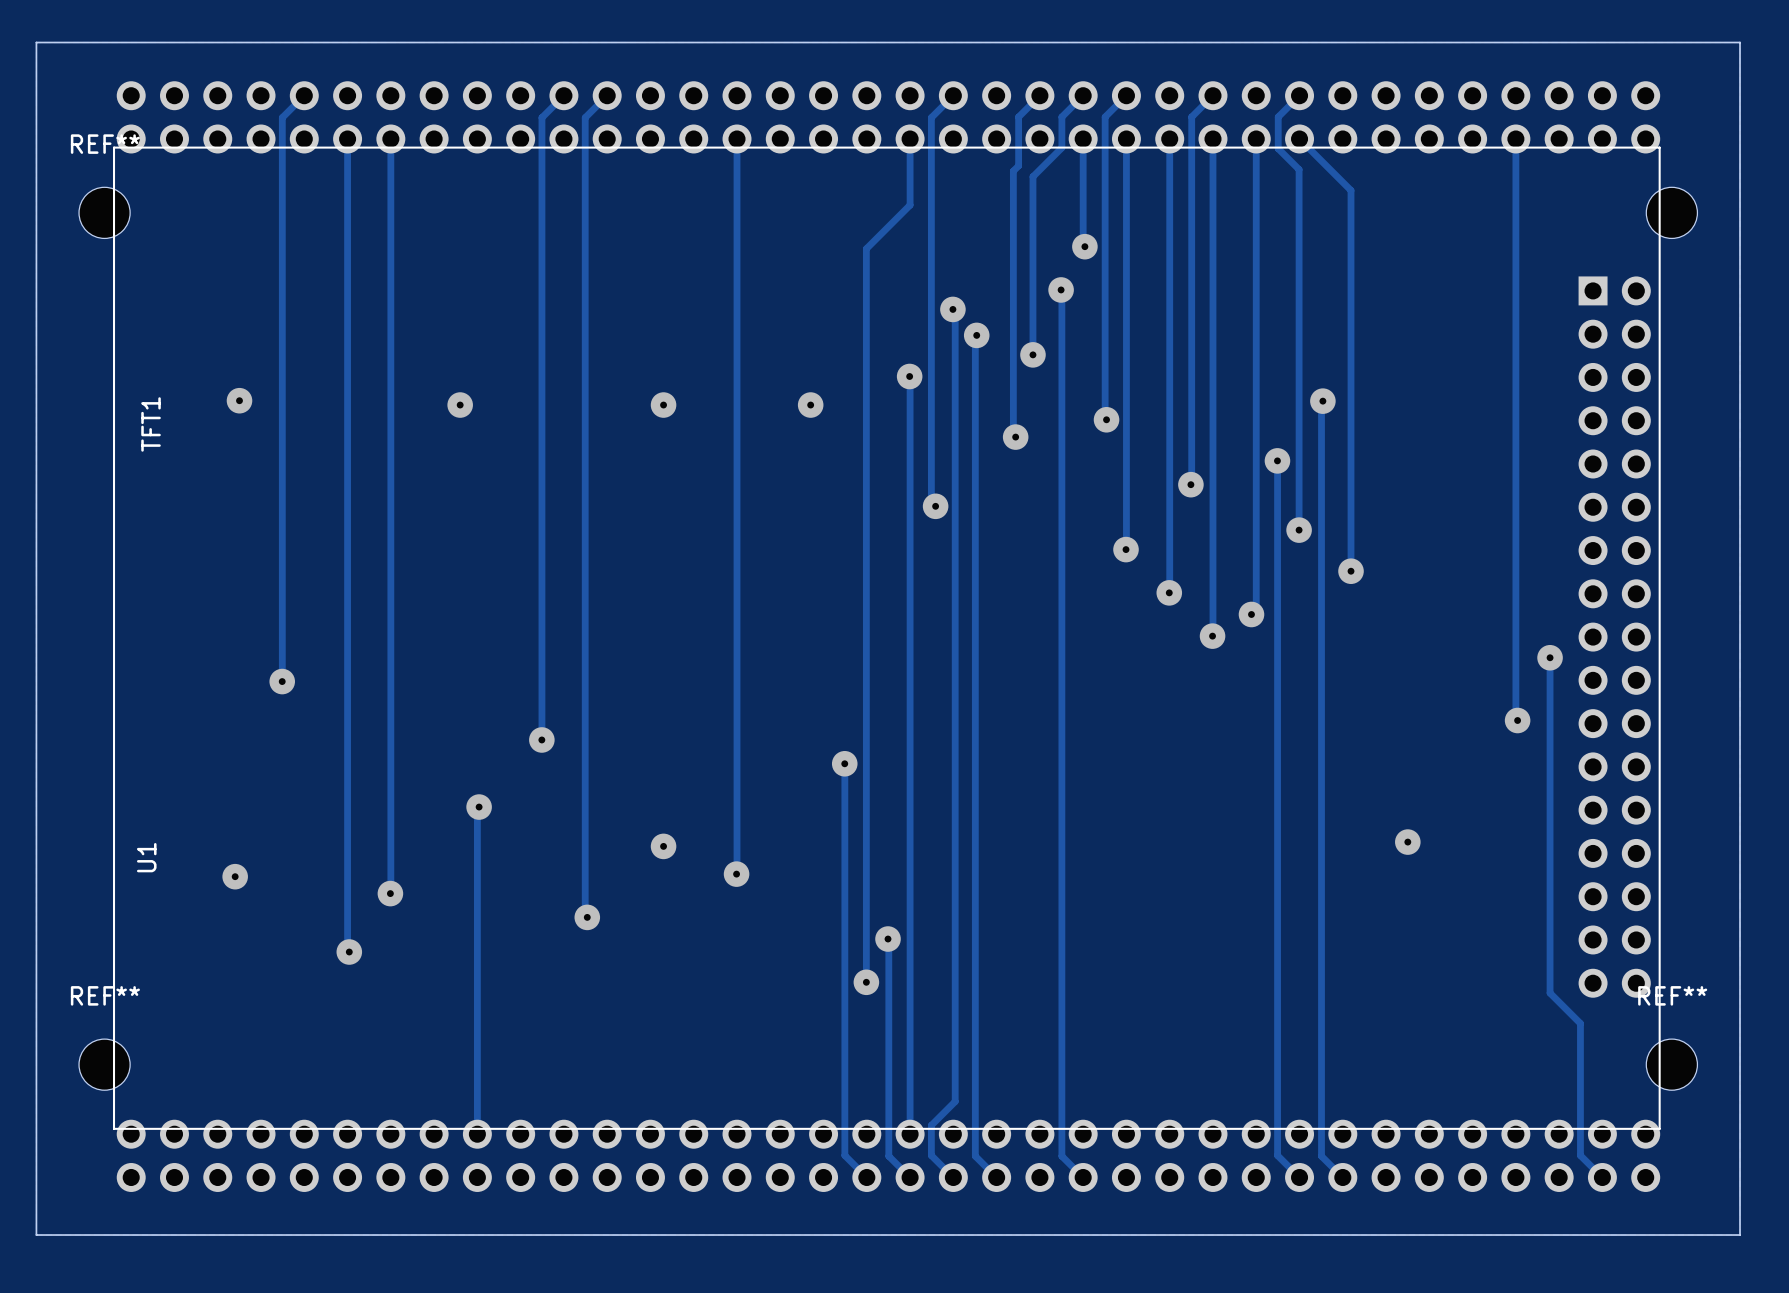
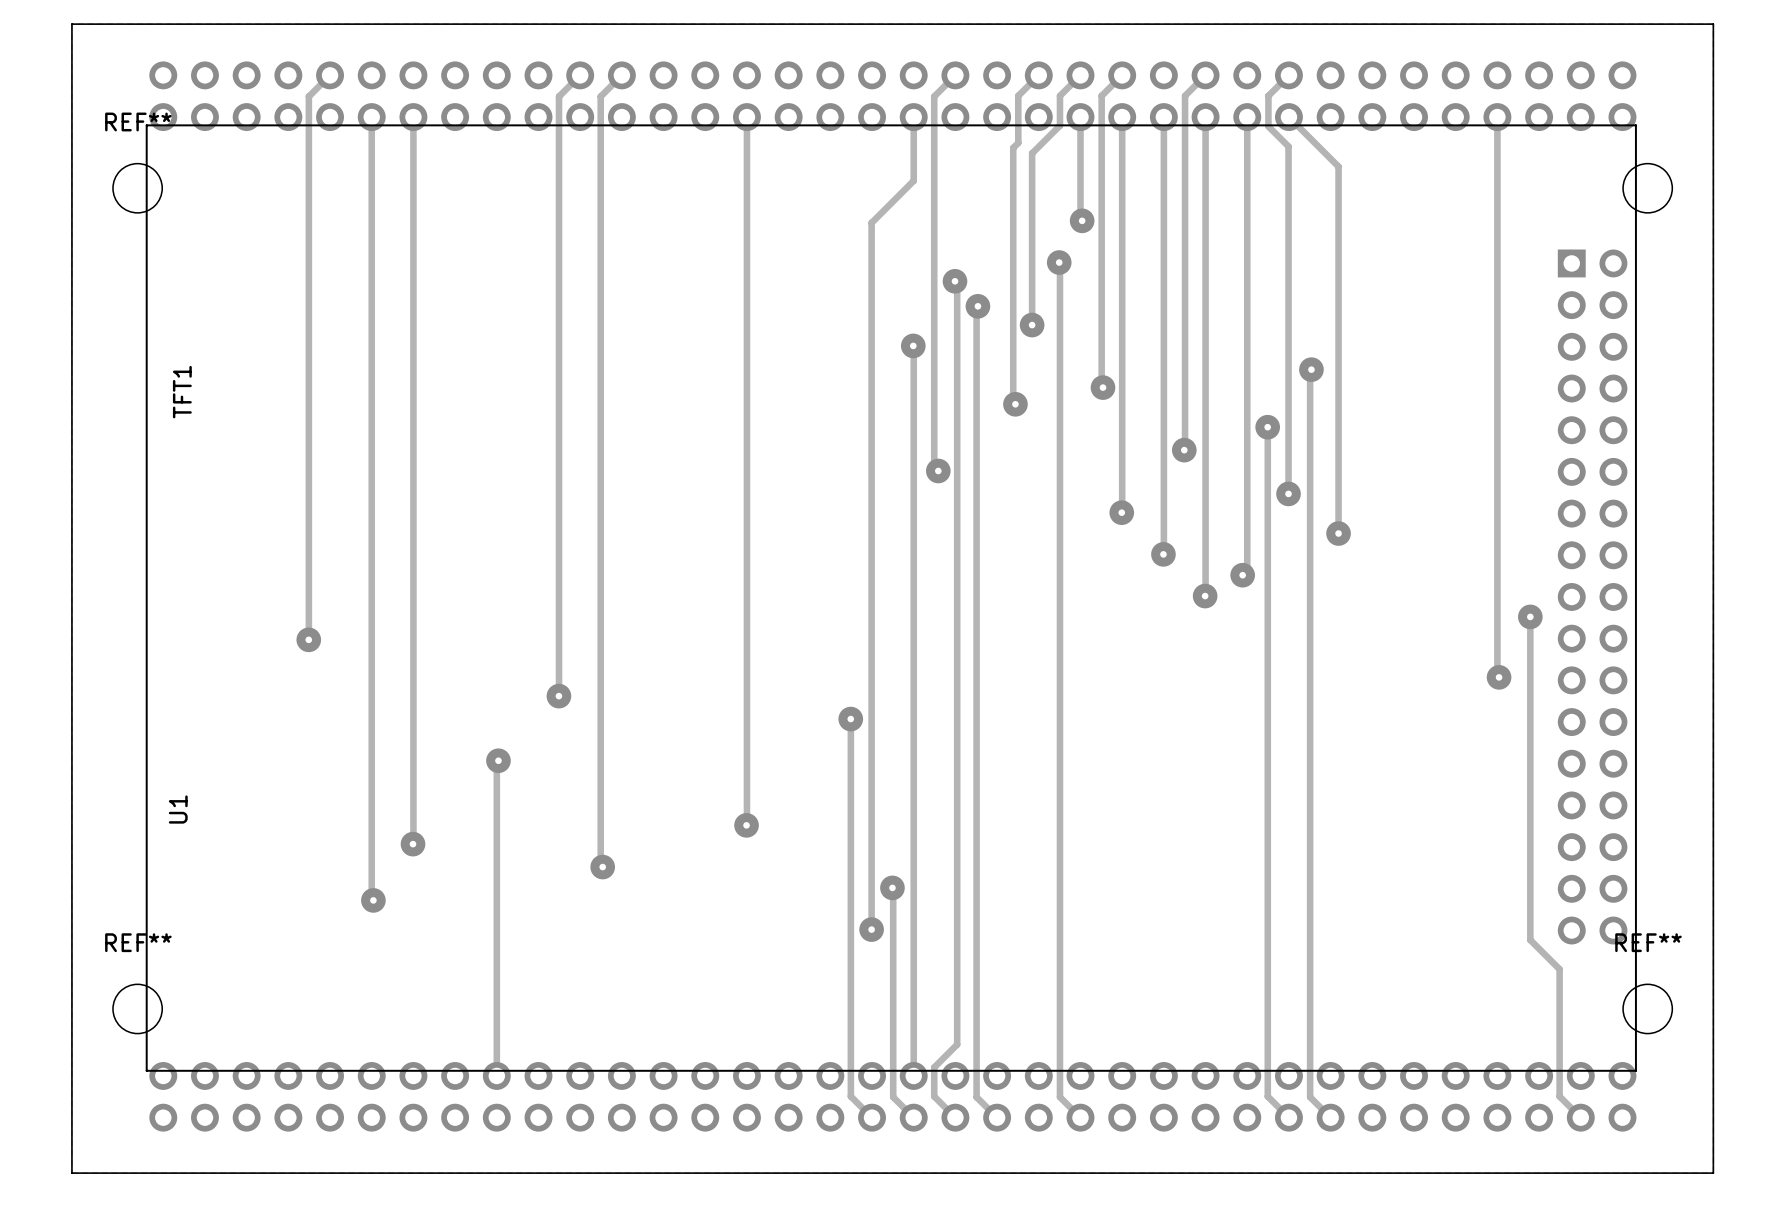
via: (239, 400) -> none
via: (460, 405) -> none
via: (663, 405) -> none
via: (810, 405) -> none
via: (1407, 842) -> none
via: (663, 846) -> none
via: (235, 876) -> none

